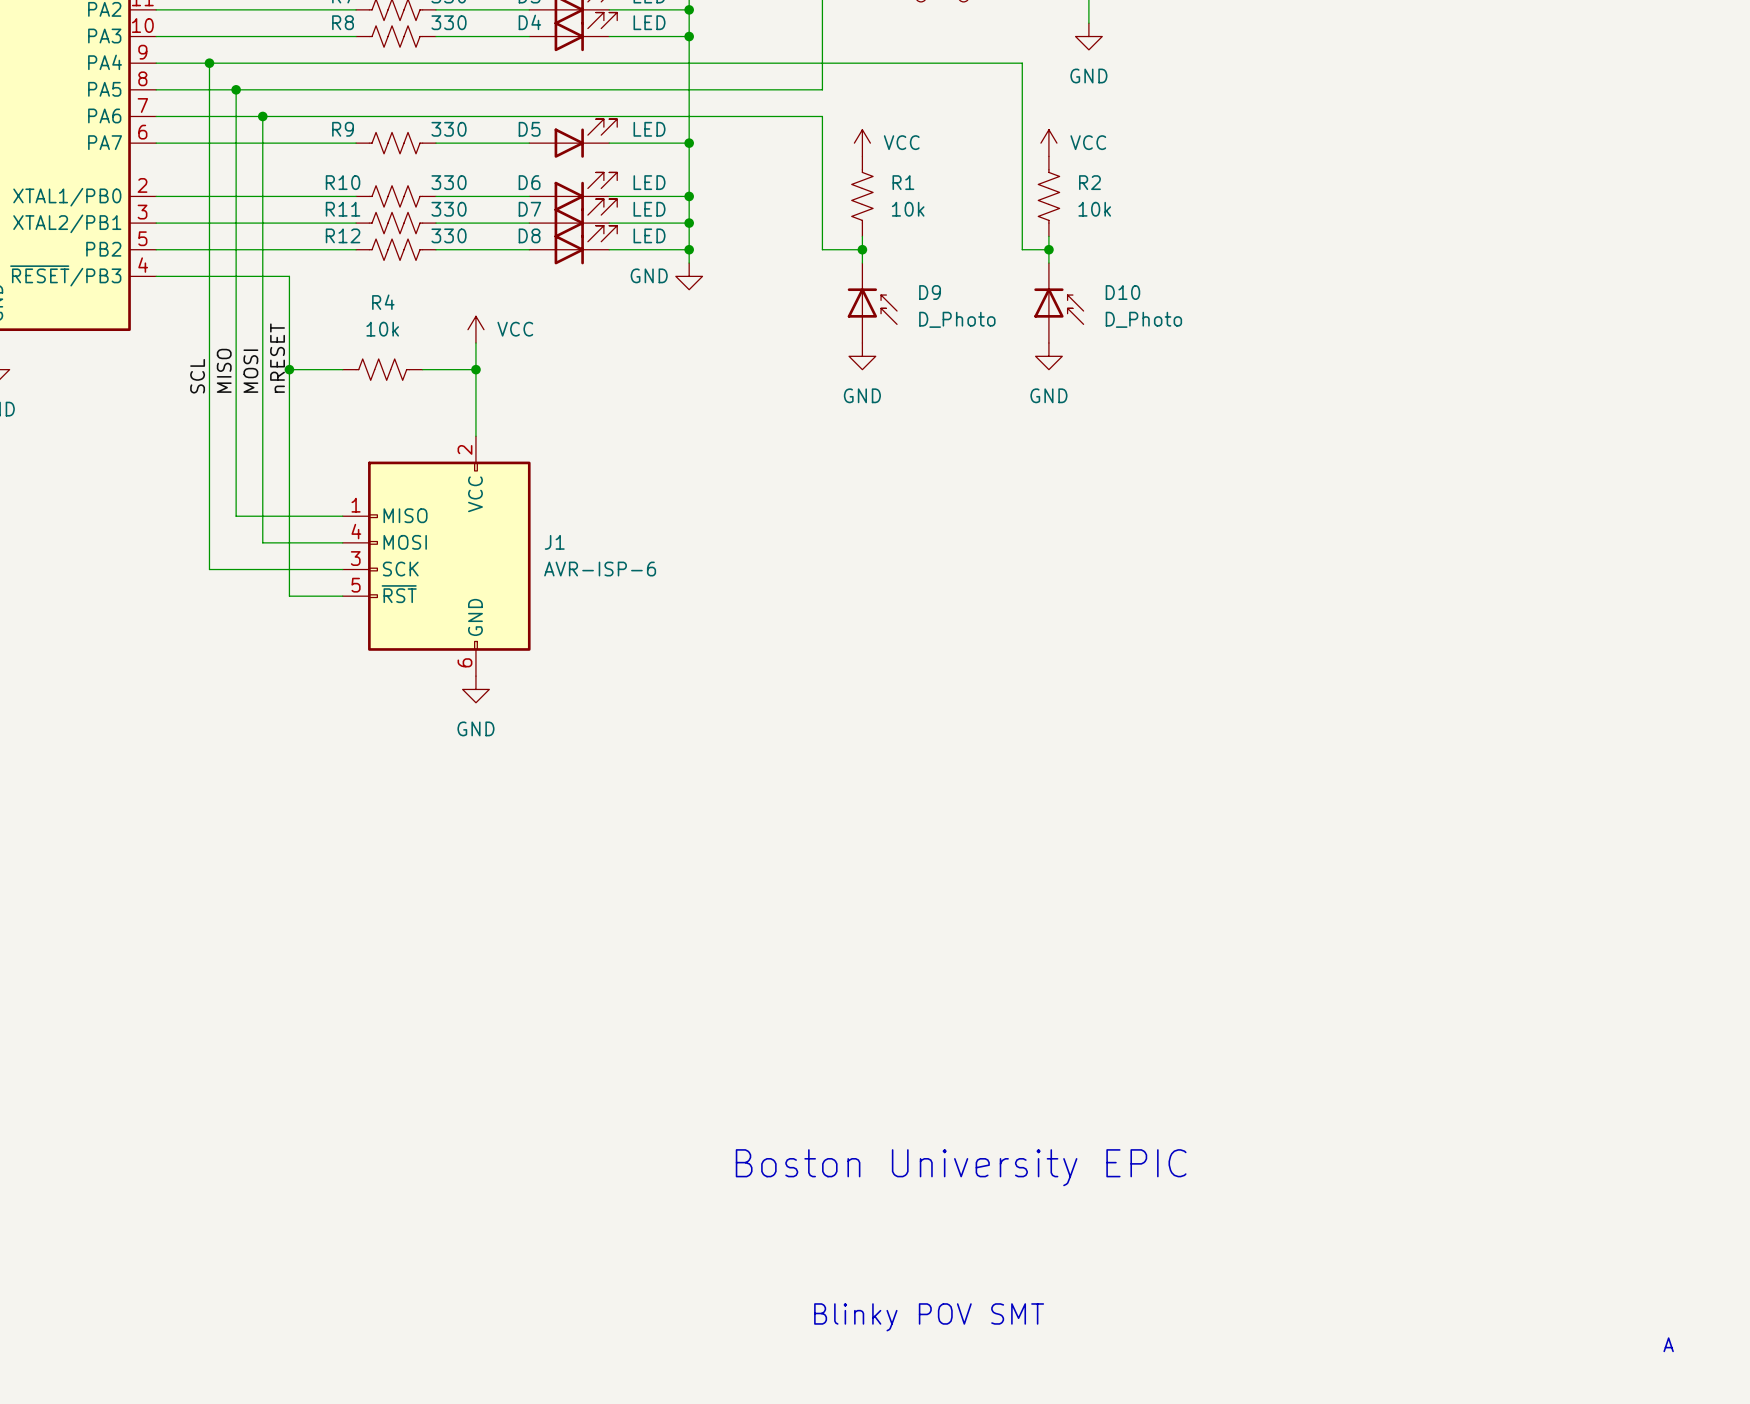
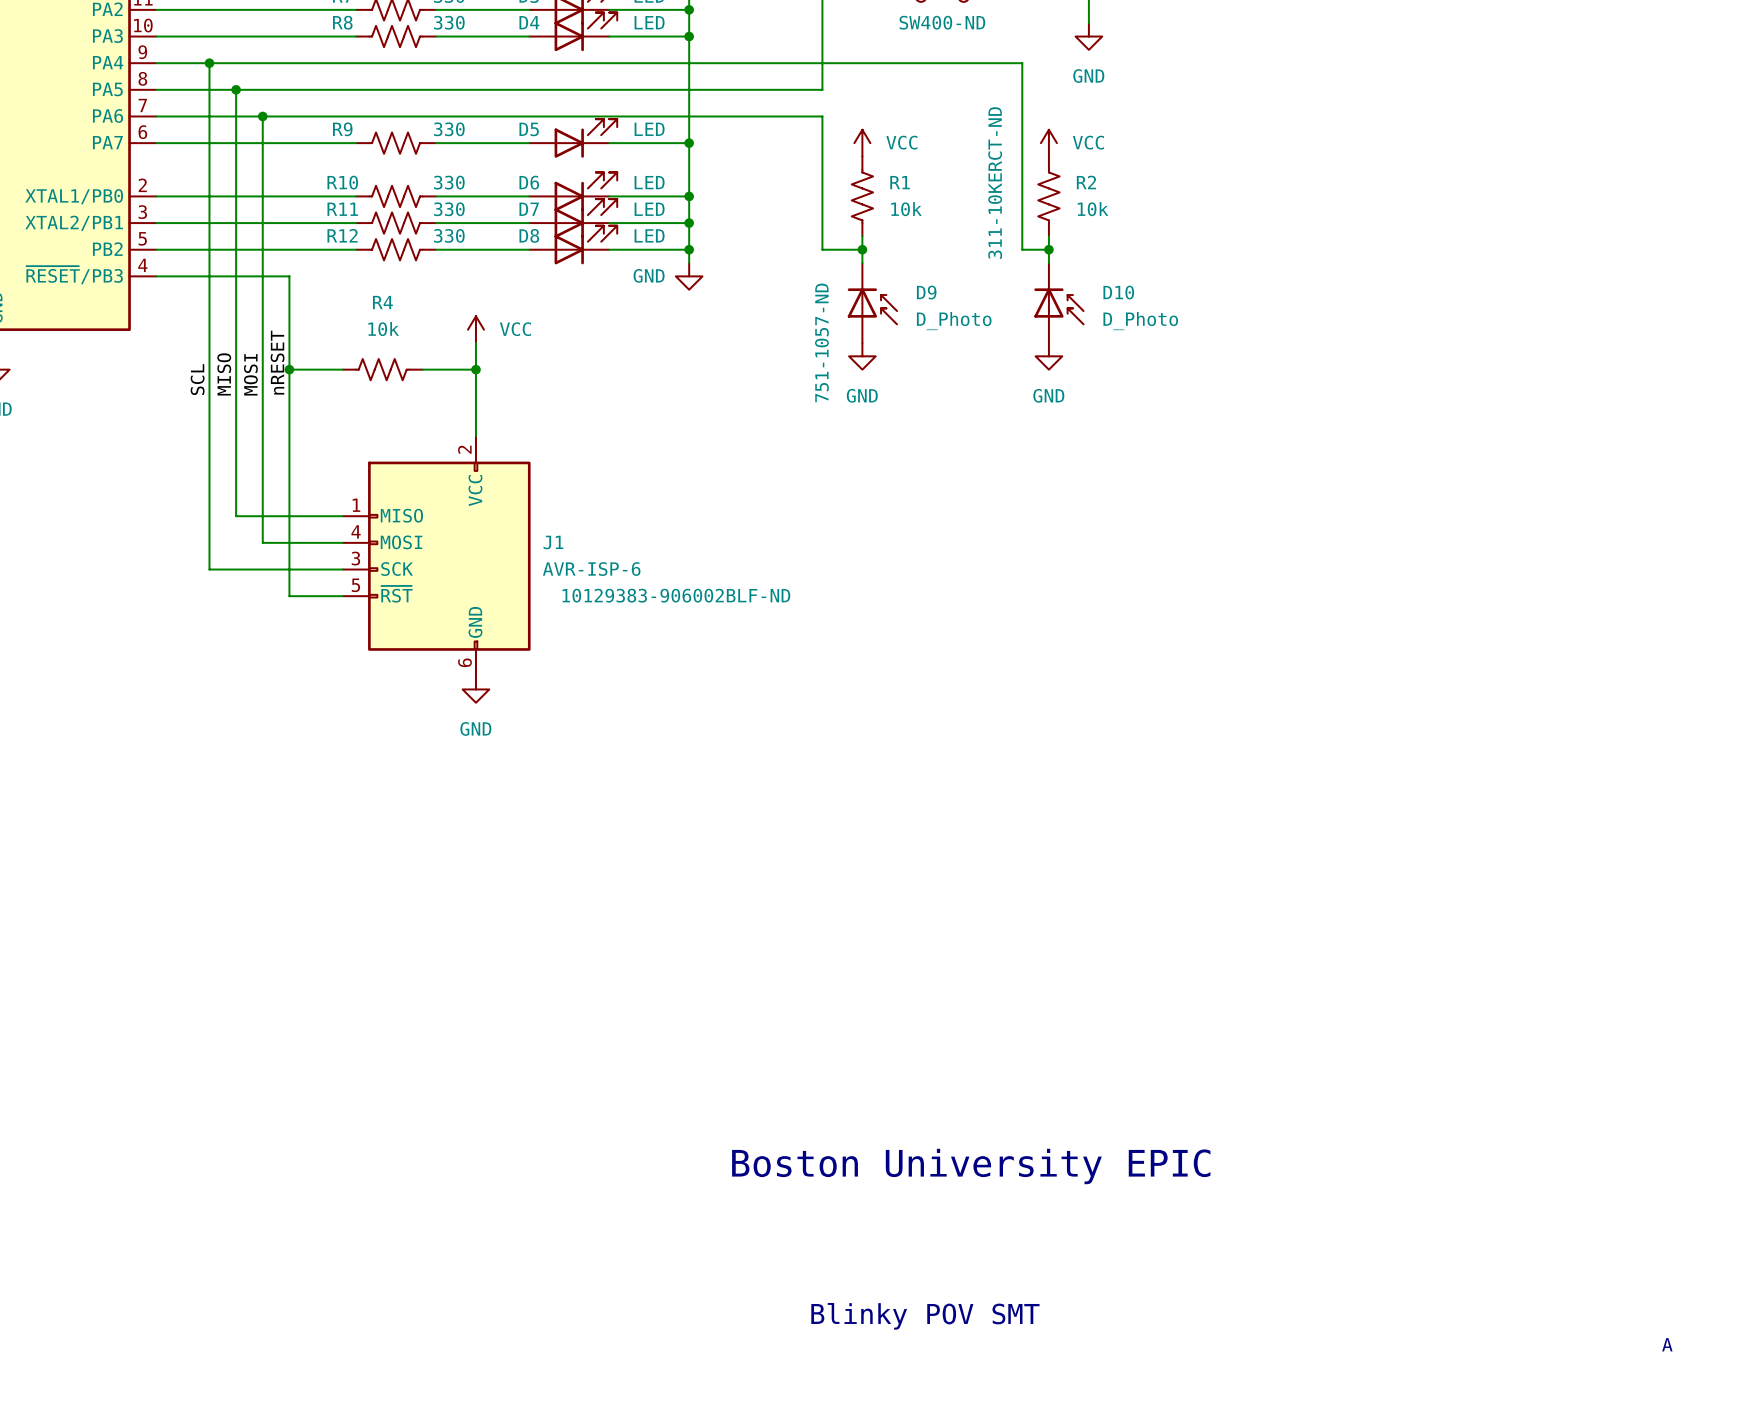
part text: none -> SW400-ND (942, 22)
R2 text: none -> 311-10KERCT-ND (995, 183)
D9 text: none -> 751-1057-ND (821, 342)
J1 text: none -> 10129383-906002BLF-ND (676, 595)

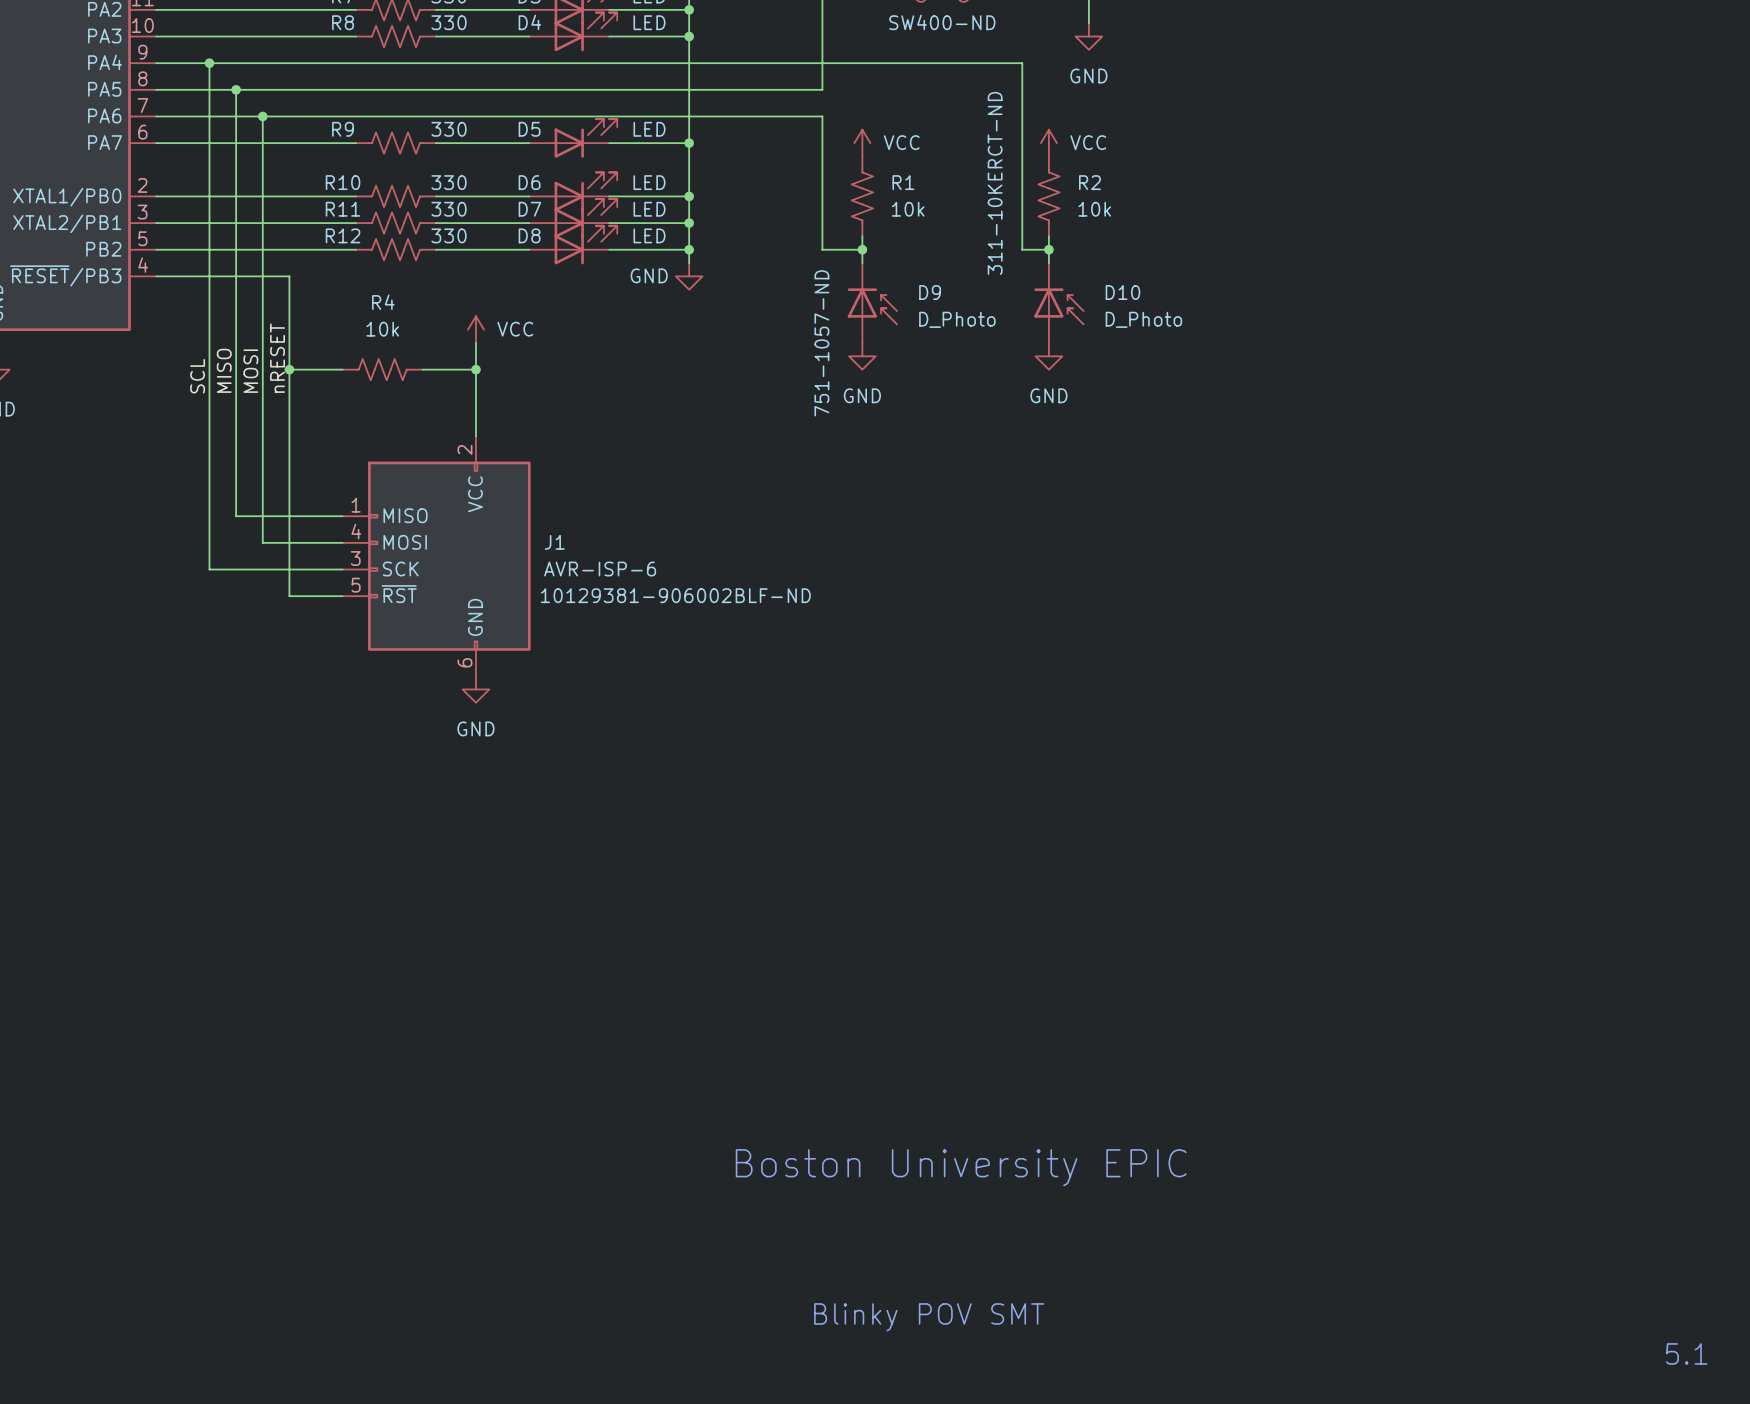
J1 text: 10129383-906002BLF-ND (676, 595) -> 10129381-906002BLF-ND (675, 595)
text: A (1667, 1344) -> none
text: none -> 5.1 (1686, 1353)

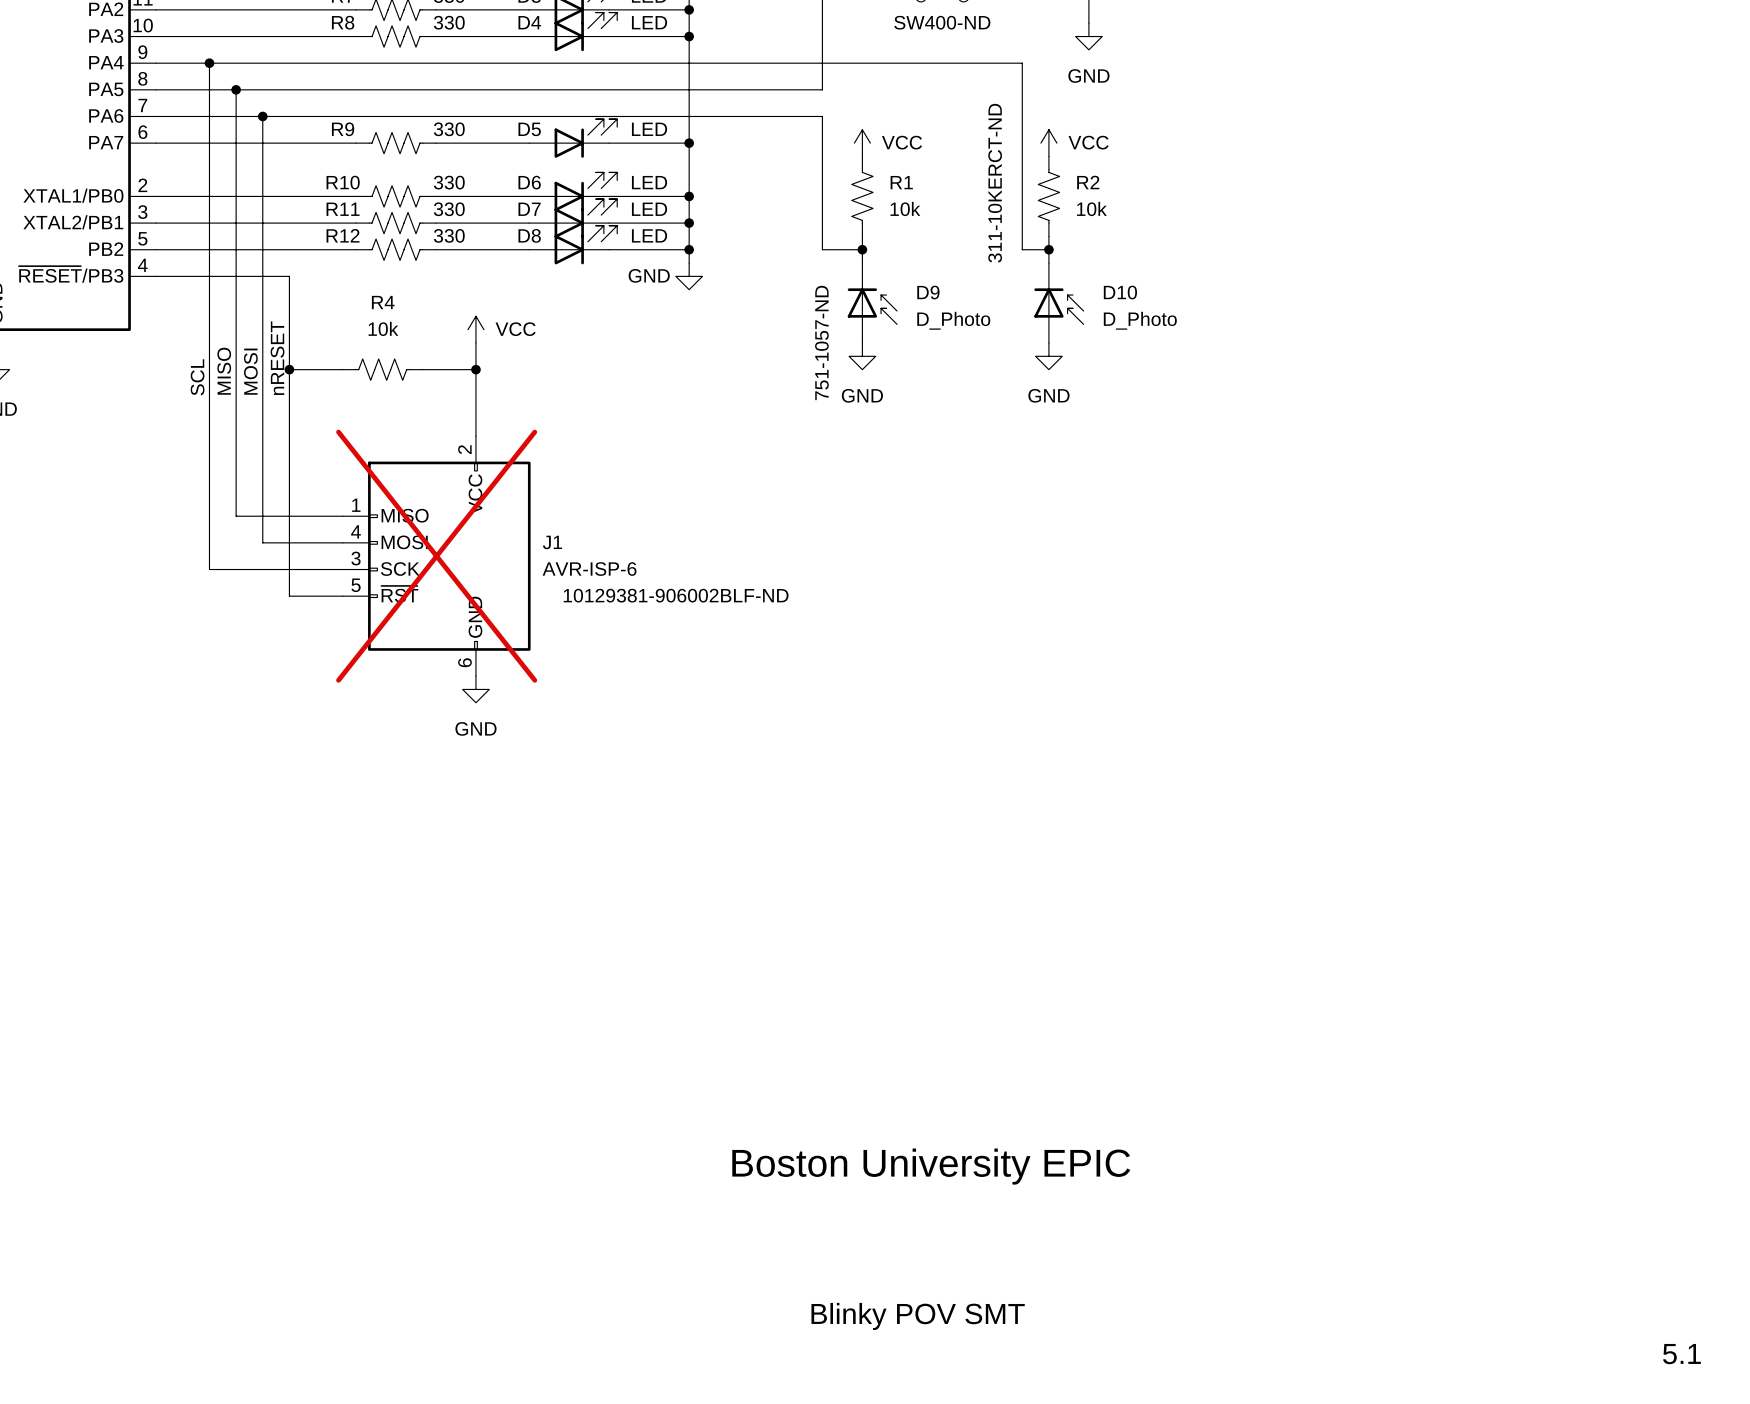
J1 do-not-place cross: none -> (436, 556)

